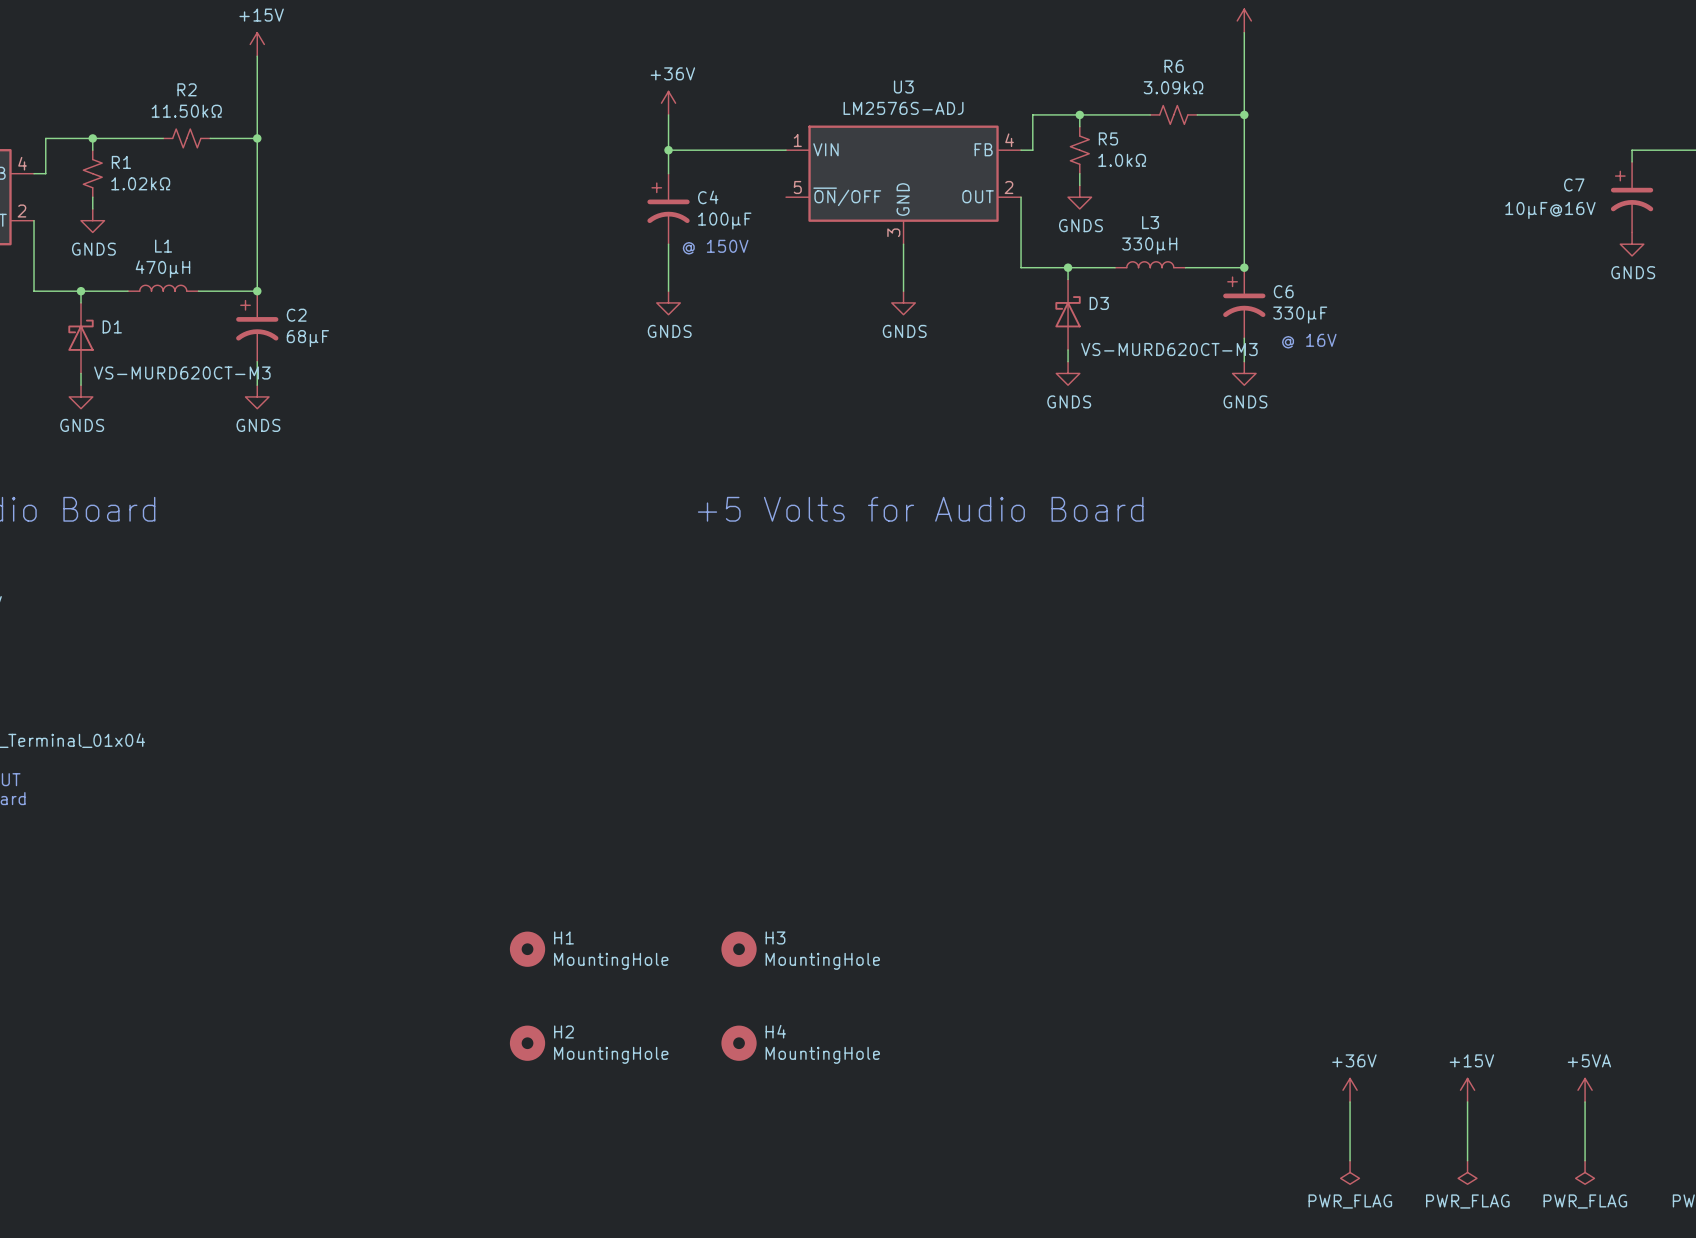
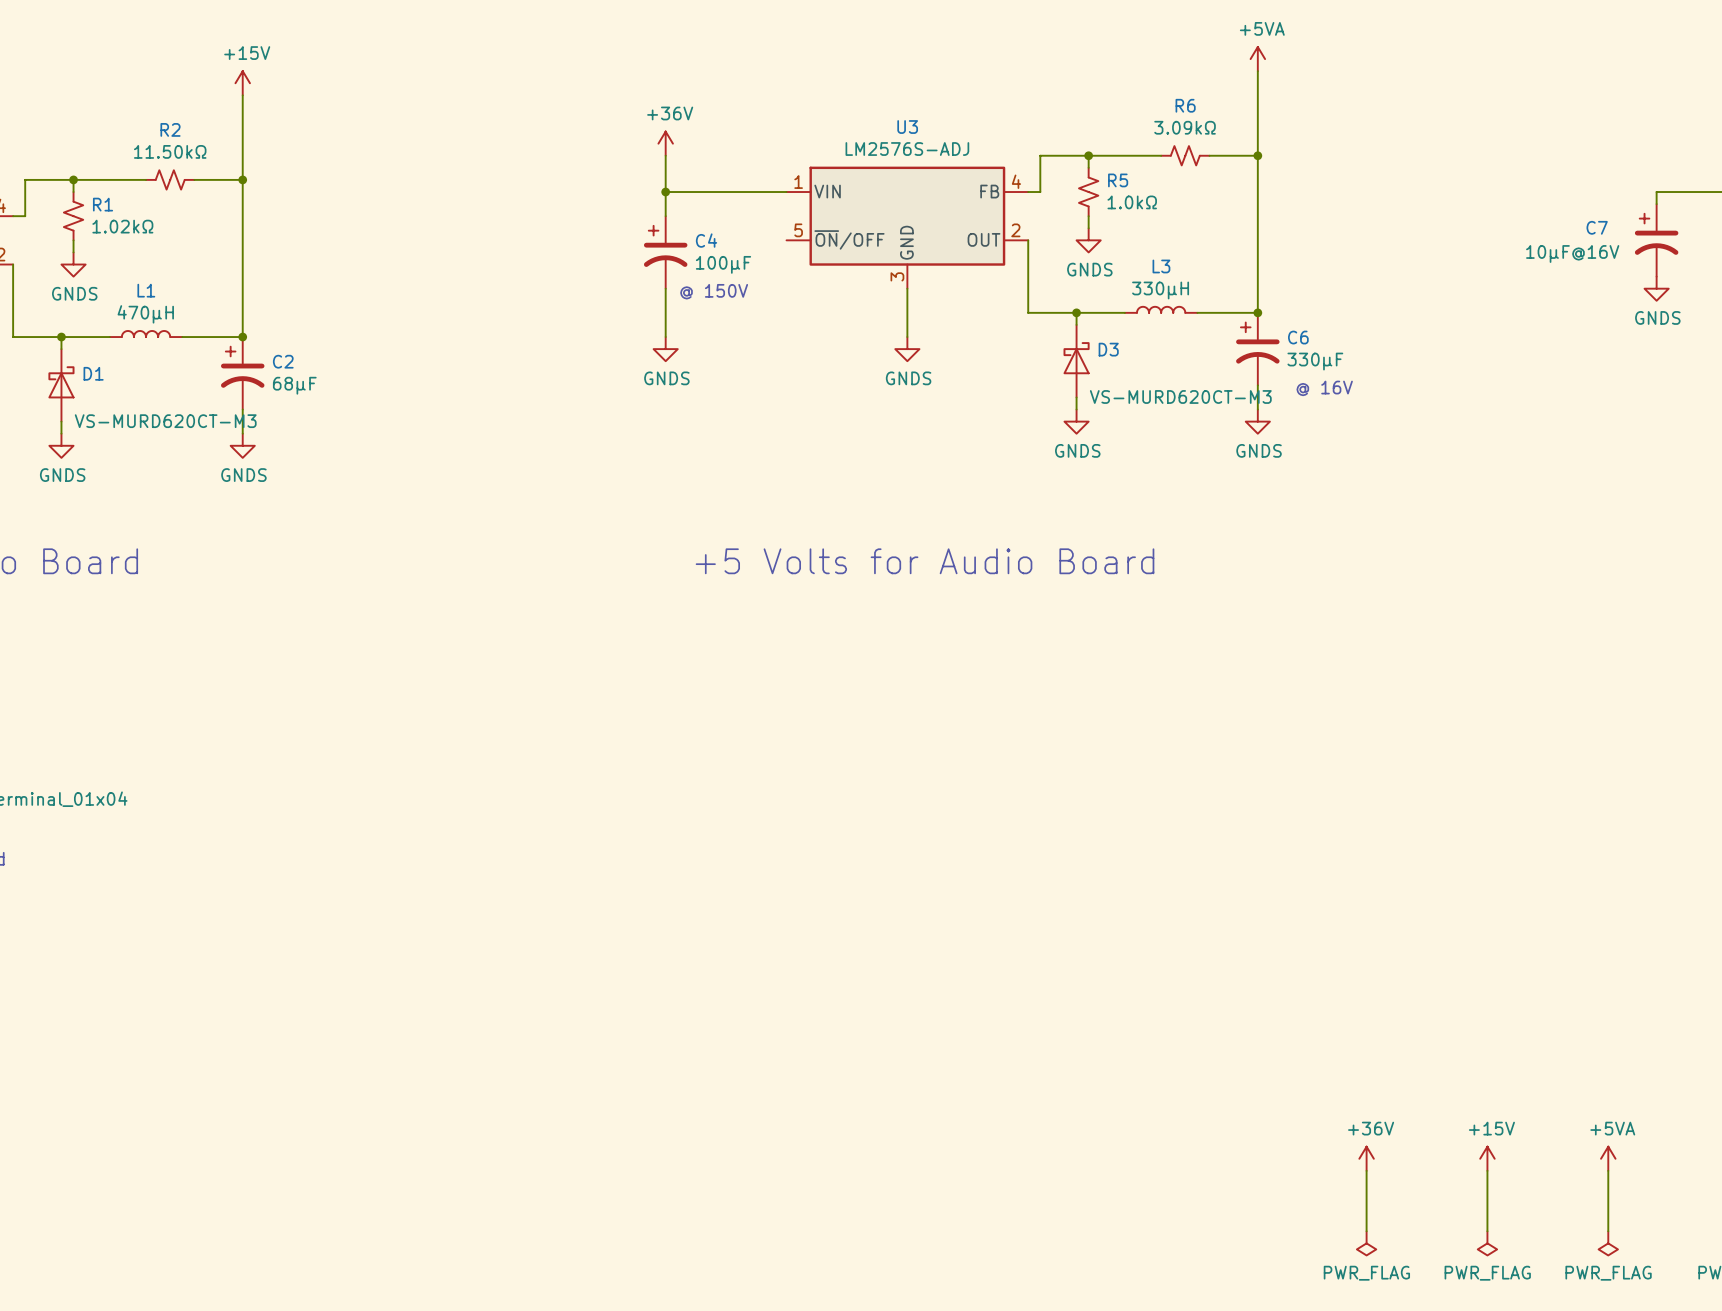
H1: MountingHole (527, 949) -> none
H3: MountingHole (739, 949) -> none
H2: MountingHole (527, 1043) -> none
H4: MountingHole (739, 1043) -> none

